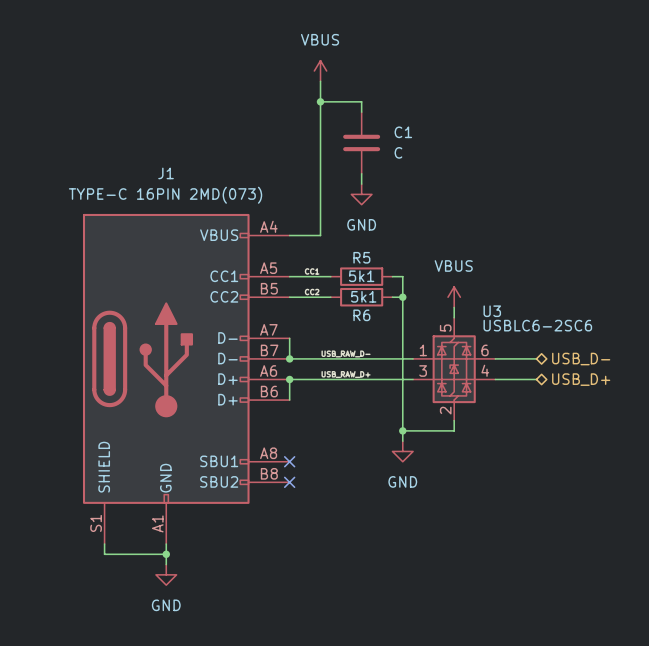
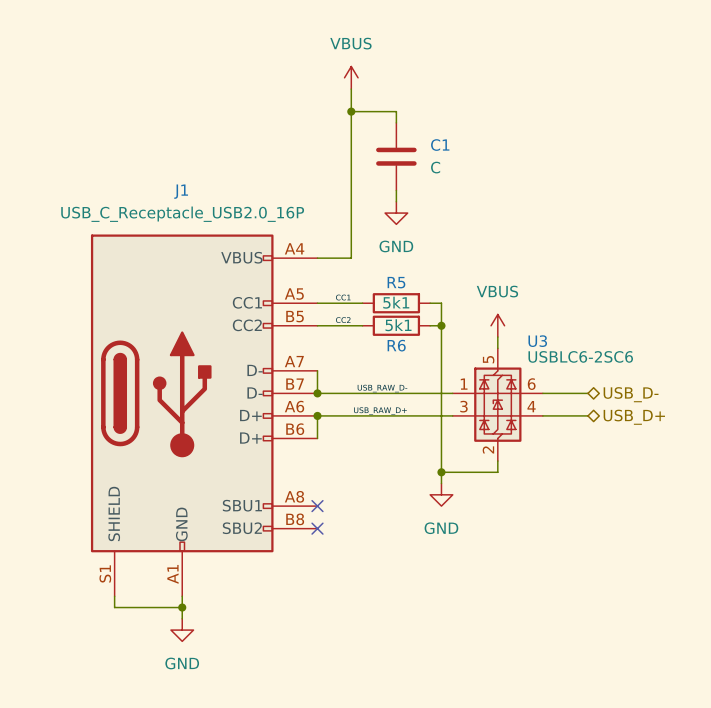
J1 value: TYPE-C 16PIN 2MD(073) (165, 195) -> USB_C_Receptacle_USB2.0_16P (182, 214)

